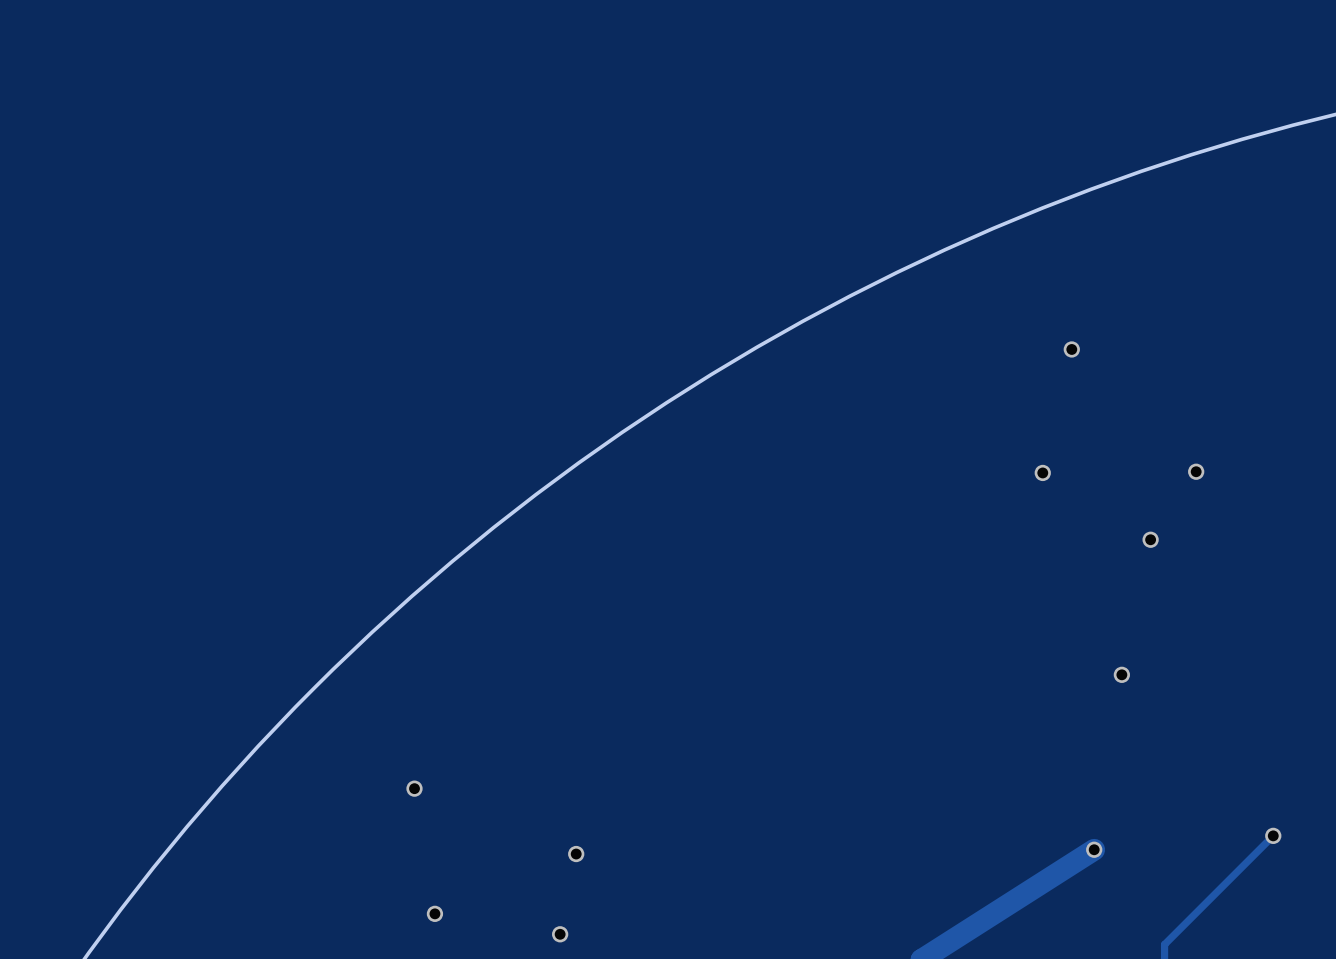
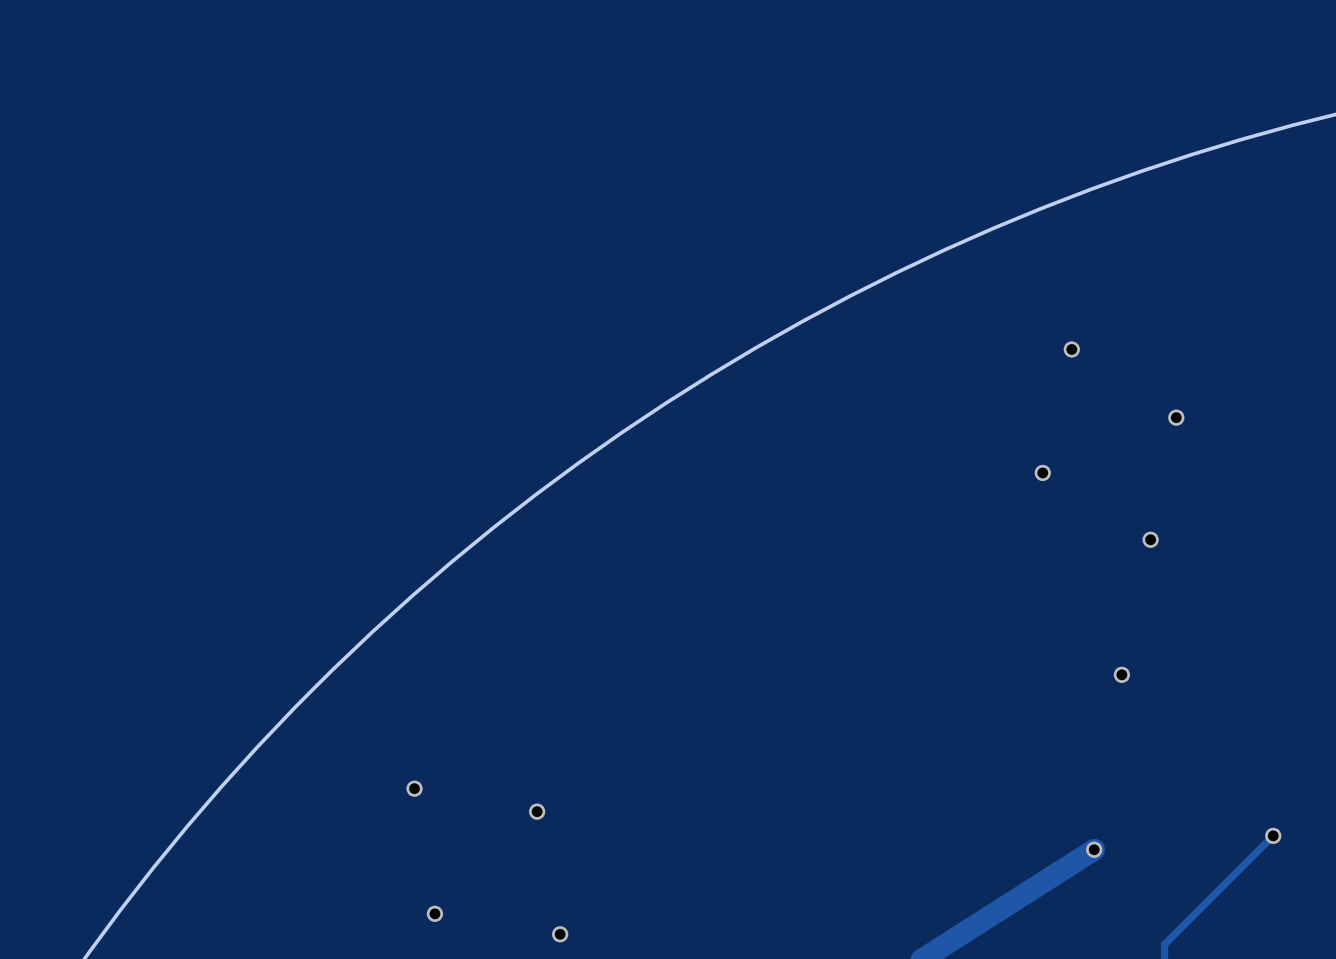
via position: (1196, 471) -> (1176, 417)
via position: (576, 854) -> (537, 811)

